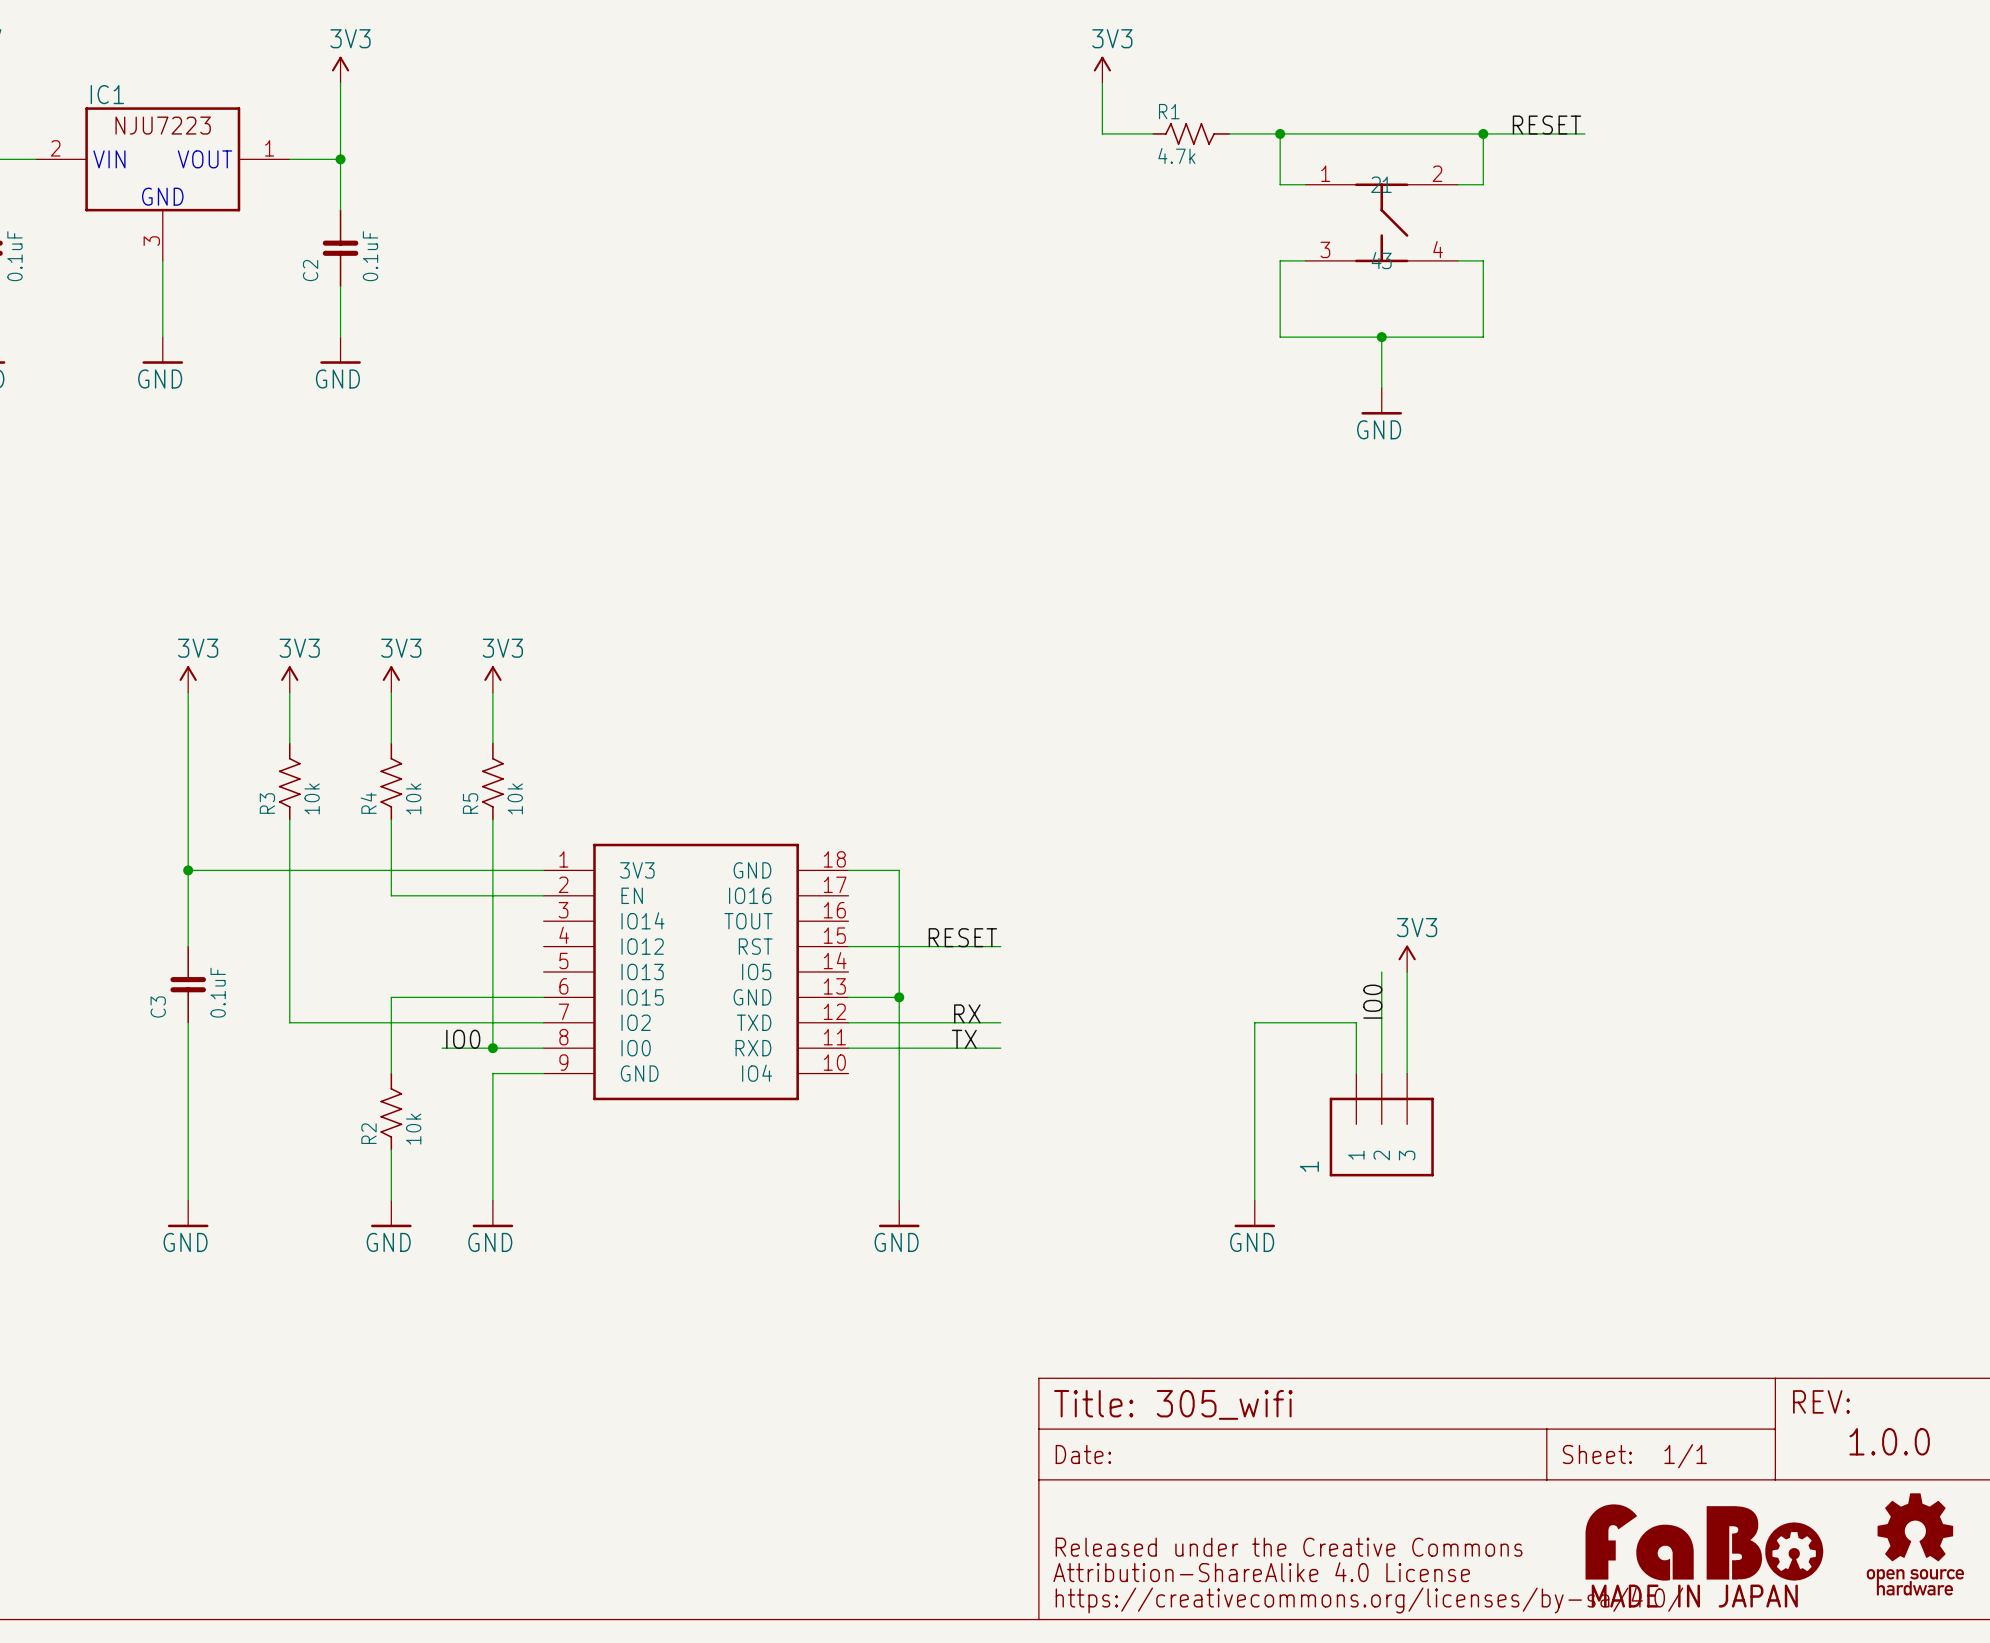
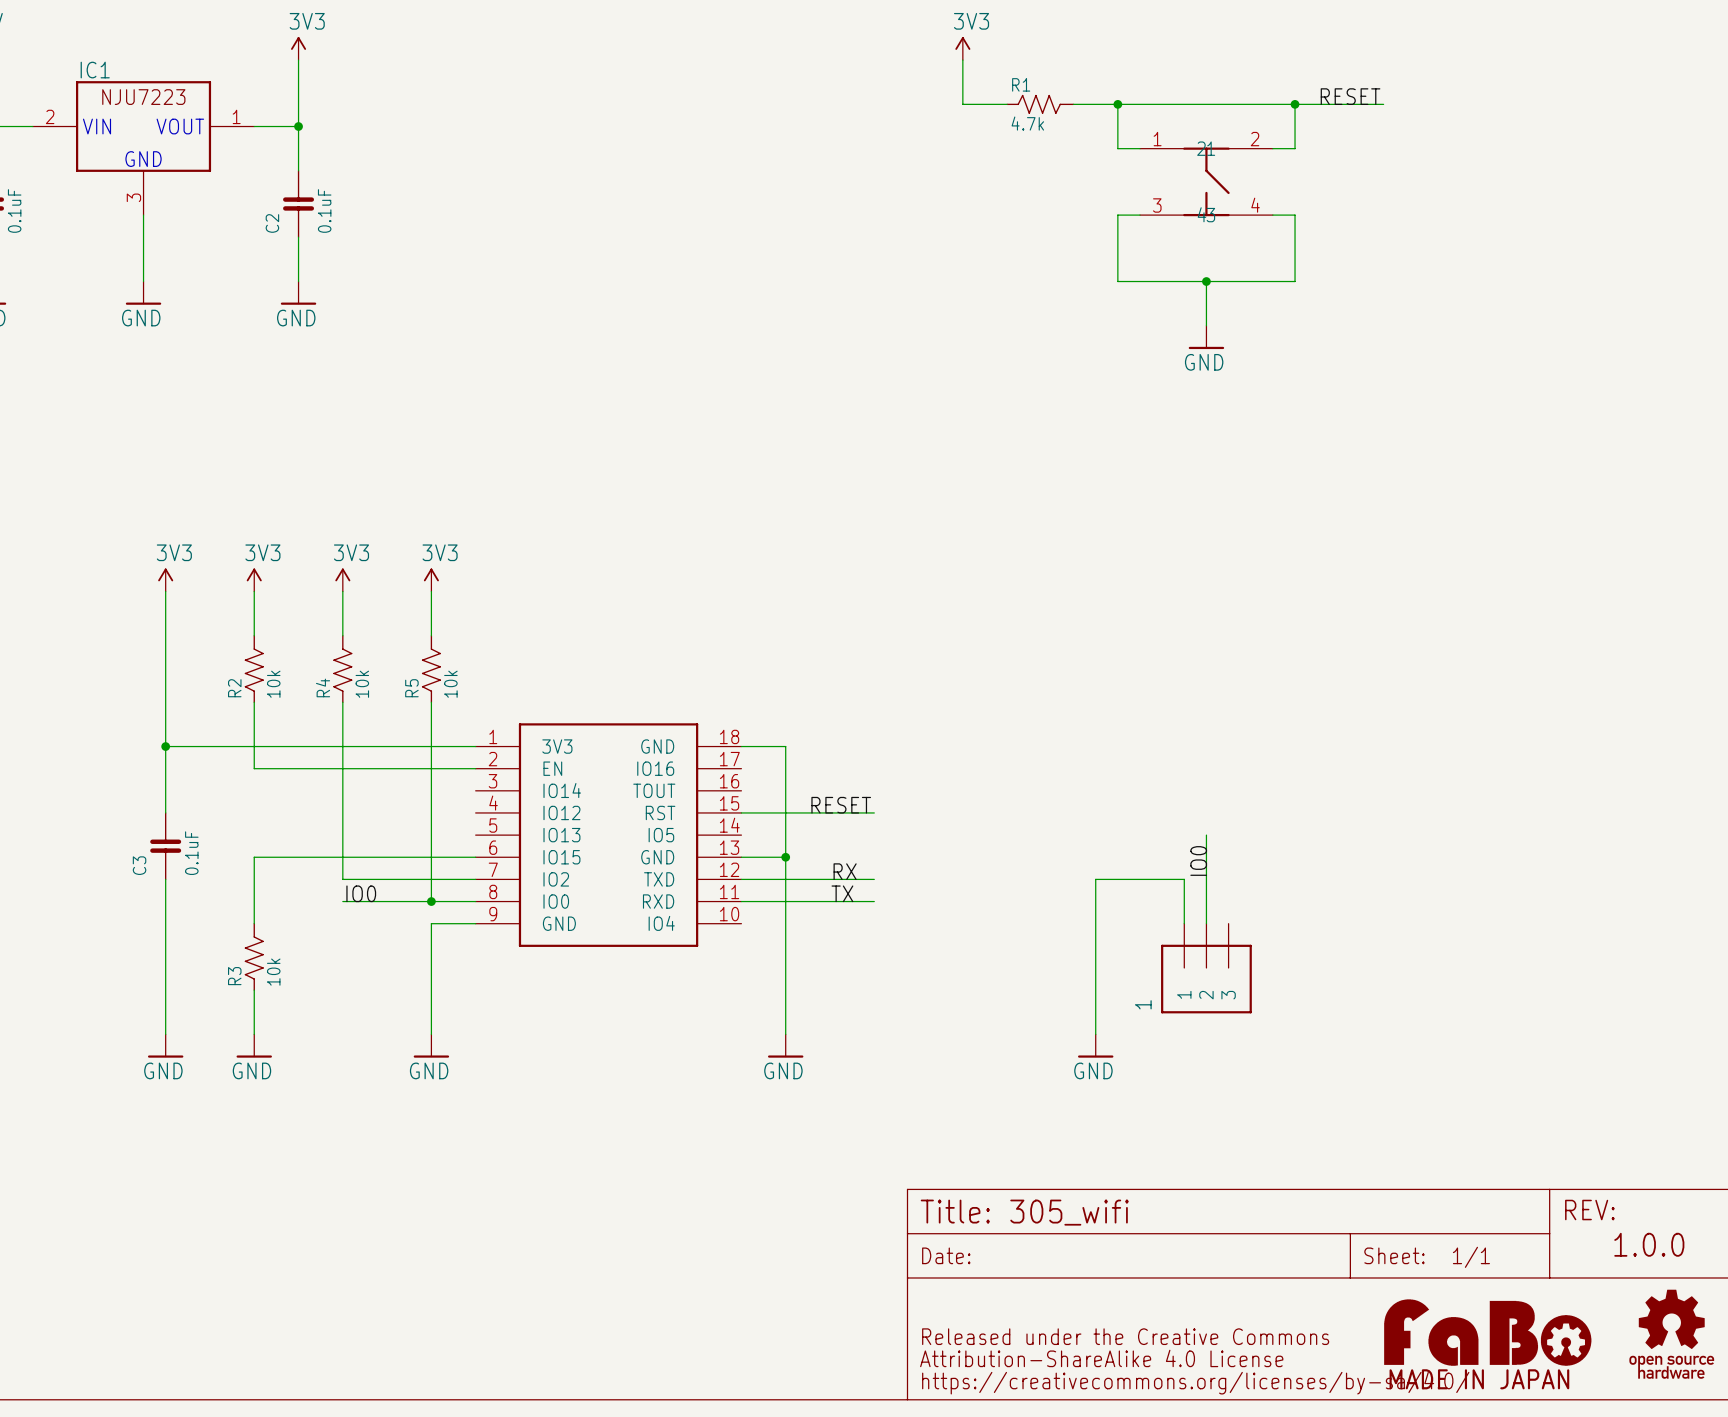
R3 name: R3 (267, 803) -> R2 (234, 688)
wire: (289, 895) (289, 997) -> (254, 768) (342, 768) (342, 857) (254, 857)
power symbol: 3V3 (1407, 958) -> none
wire: (1407, 971) (1407, 1073) -> none
wire: (289, 1022) (391, 1022) (391, 1073) -> (254, 879) (254, 923)
label position: IO0 (463, 1039) -> IO0 (361, 893)
wire: none -> (342, 901) (387, 901)
R3: none -> 10k (254, 956)
R2: 10k (391, 1111) -> none
wire: (391, 1149) (391, 1200) -> (254, 990) (254, 1034)
power symbol position: GND (391, 1213) -> GND (254, 1046)

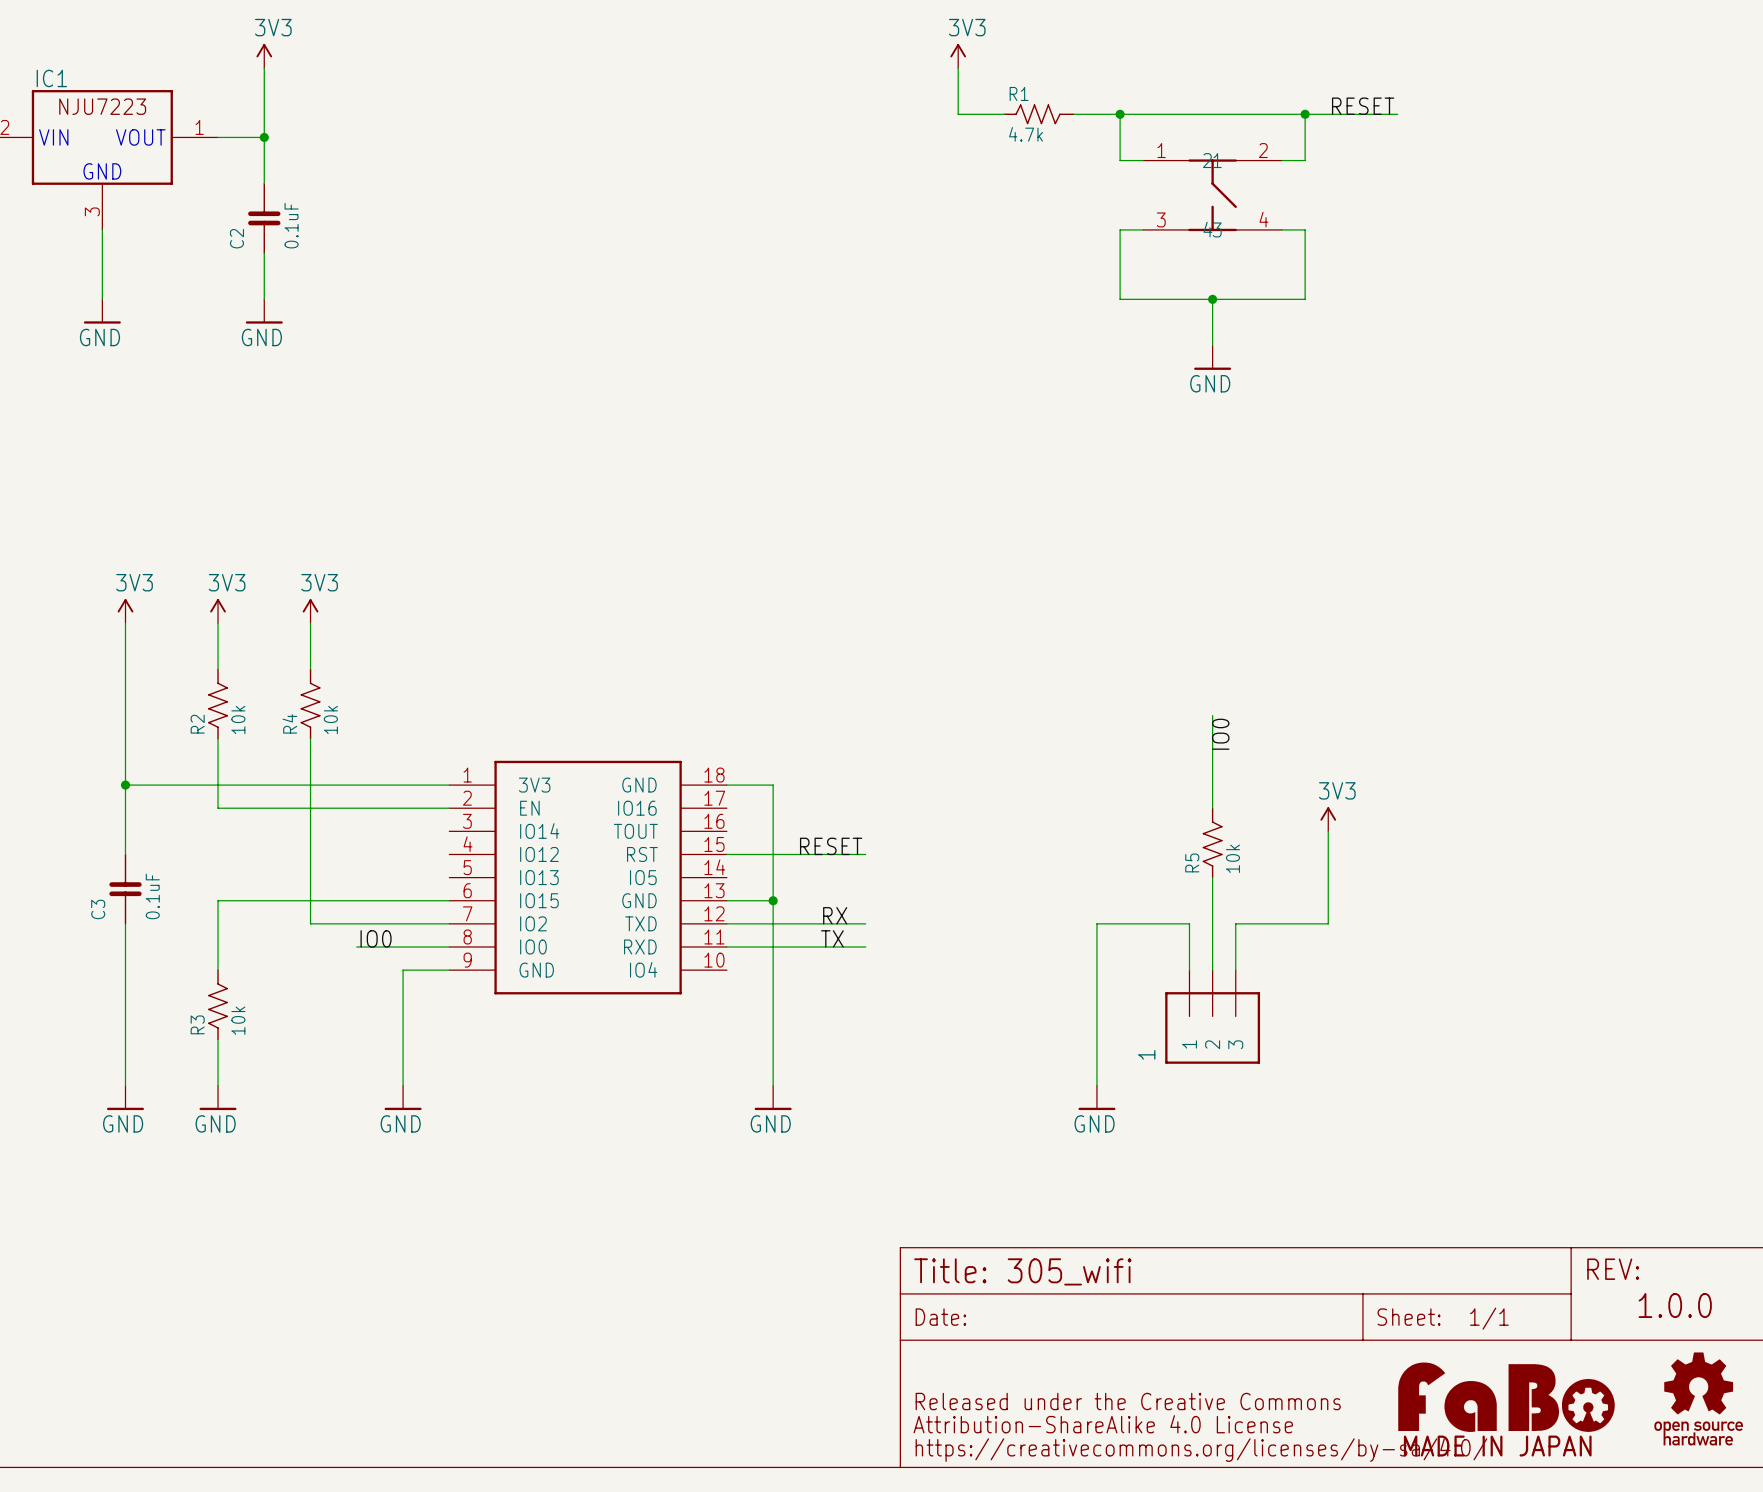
power symbol: 3V3 (431, 580) -> none
wire: (431, 591) (431, 635) -> none
R5 position: (431, 669) -> (1212, 842)
wire: none -> (1212, 715) (1212, 808)
wire: (431, 702) (431, 901) -> none
power symbol: none -> 3V3 (1328, 819)
wire: none -> (1328, 831) (1328, 923) (1235, 923) (1235, 970)
label position: IO0 (1198, 860) -> IO0 (1220, 734)
label position: IO0 (361, 893) -> IO0 (376, 938)
wire: (342, 901) (387, 901) -> none
junction: (431, 901) -> none

